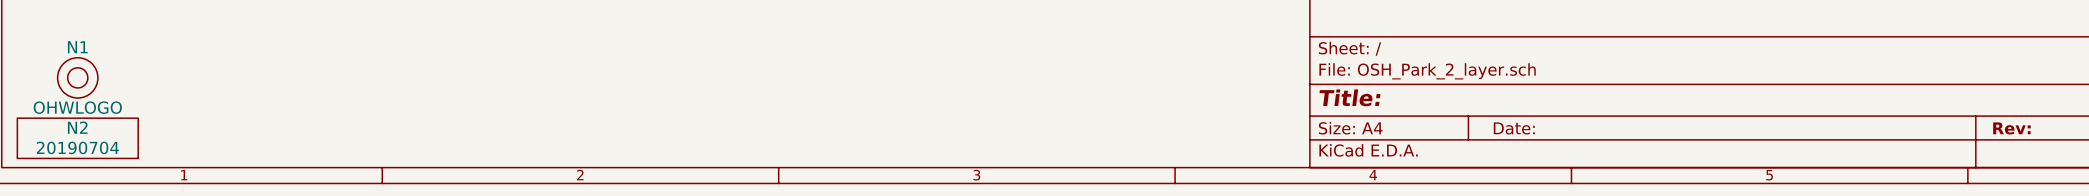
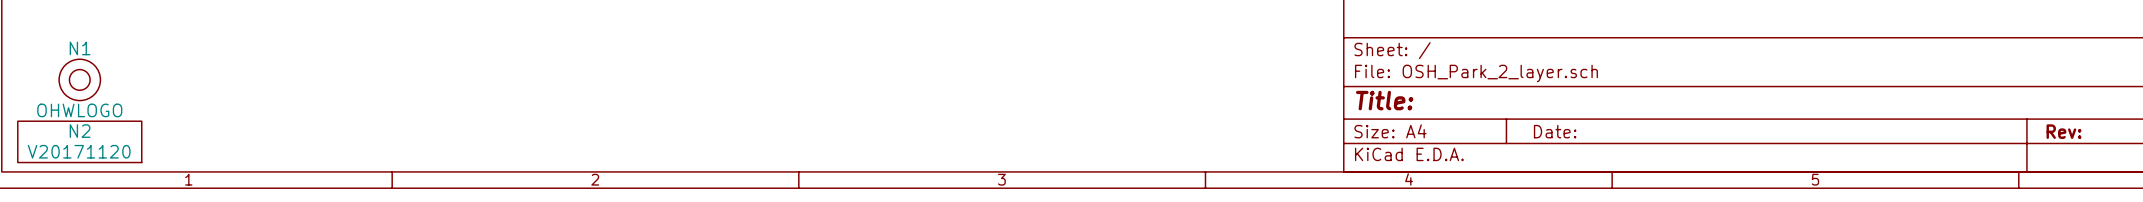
N2 value: 20190704 (77, 147) -> V20171120 (79, 151)

